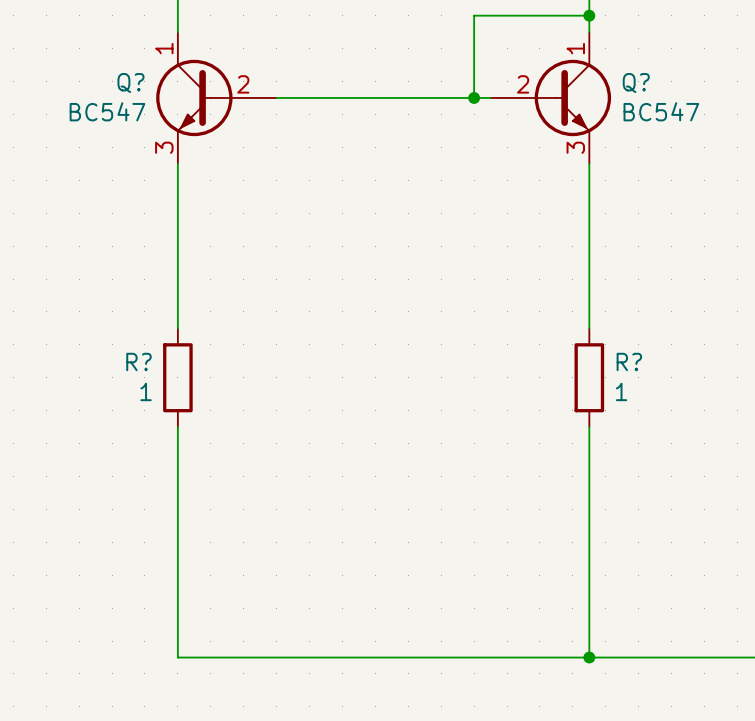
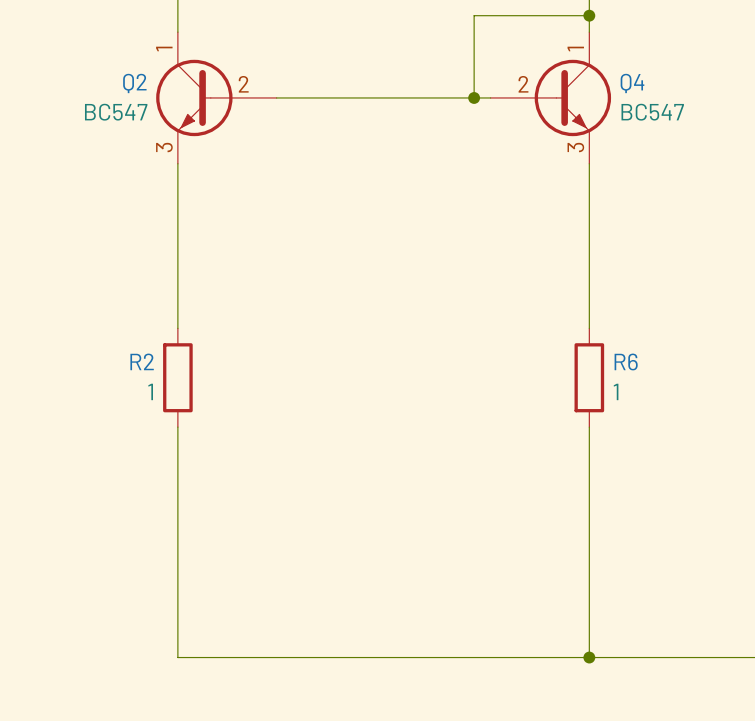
Q? name: Q? (130, 83) -> Q2 (134, 83)
Q? name: Q? (636, 83) -> Q4 (632, 83)
R? name: R? (138, 362) -> R2 (142, 361)
R? name: R? (629, 362) -> R6 (626, 361)

